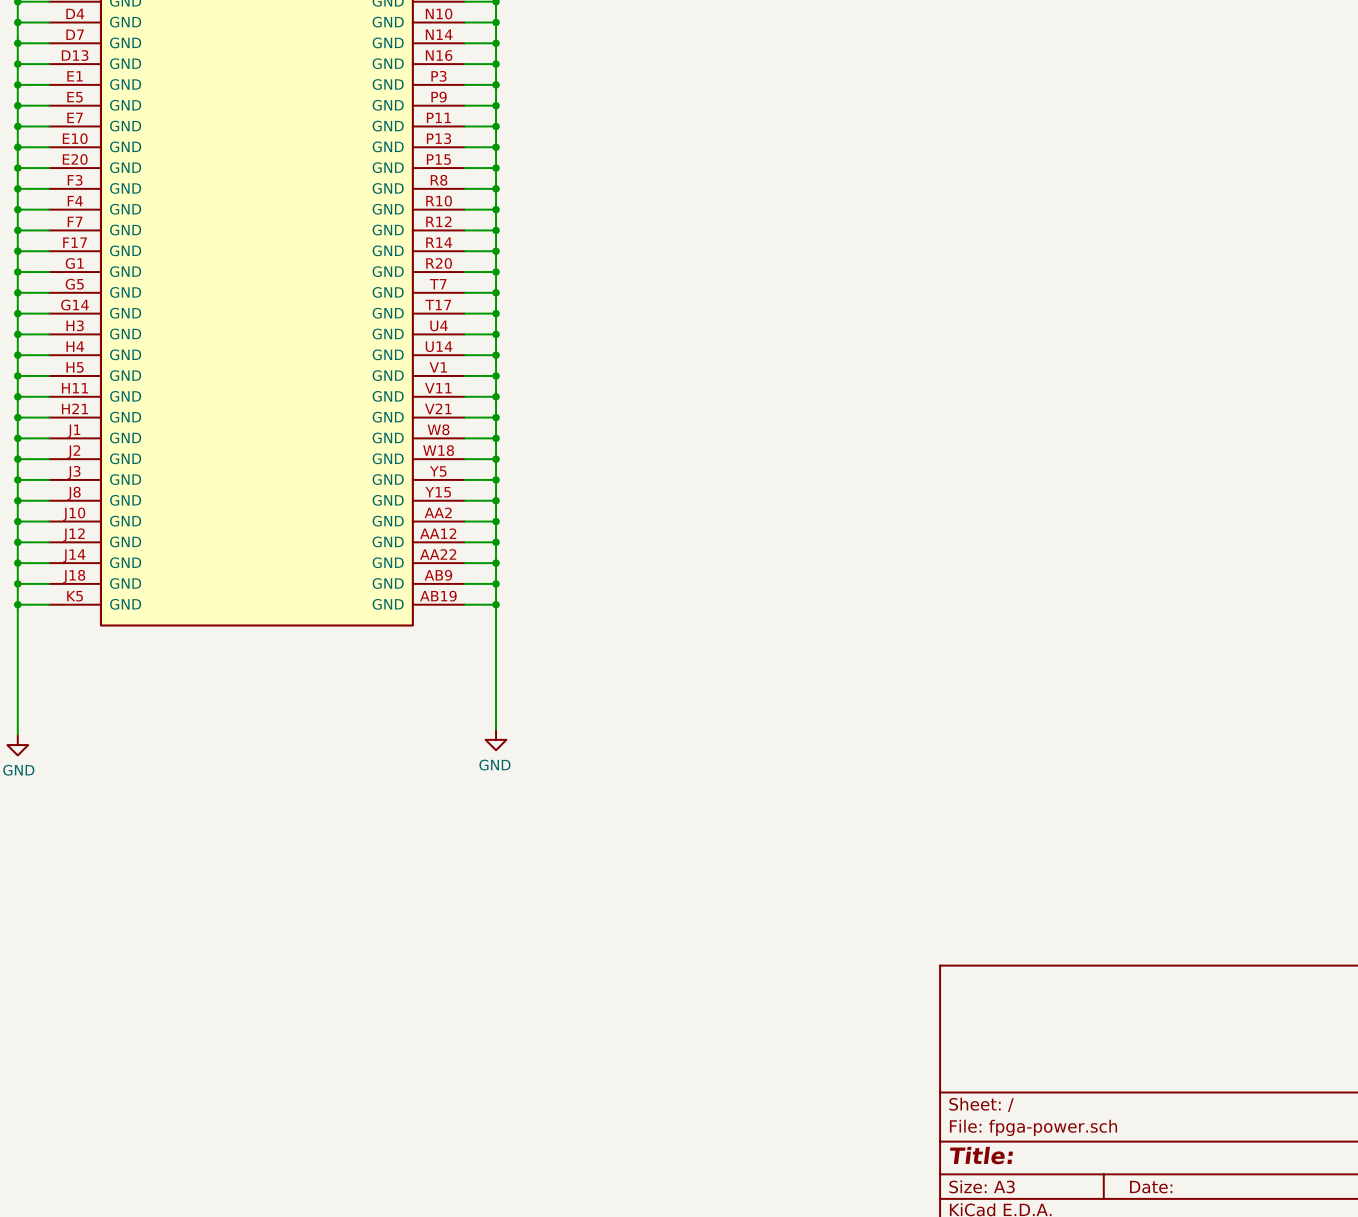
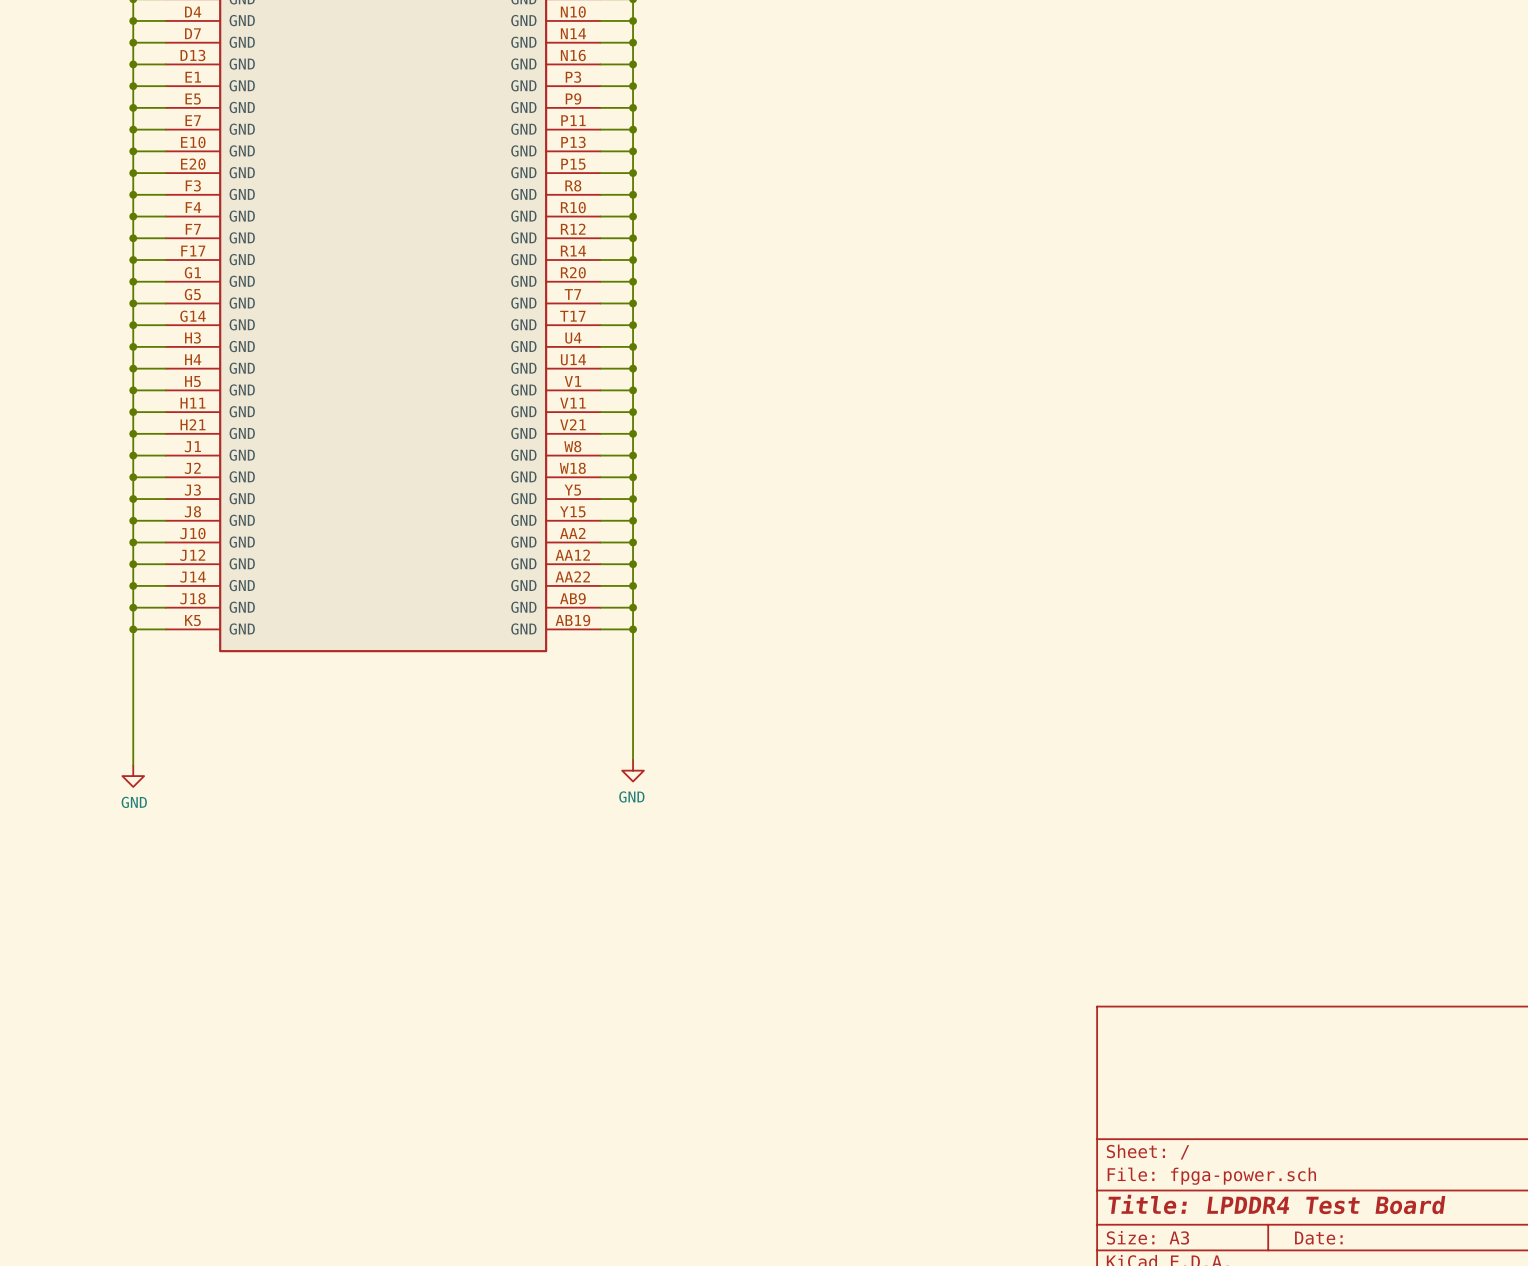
title block: Title: (981, 1155) -> Title: LPDDR4 Test Board (1276, 1204)

